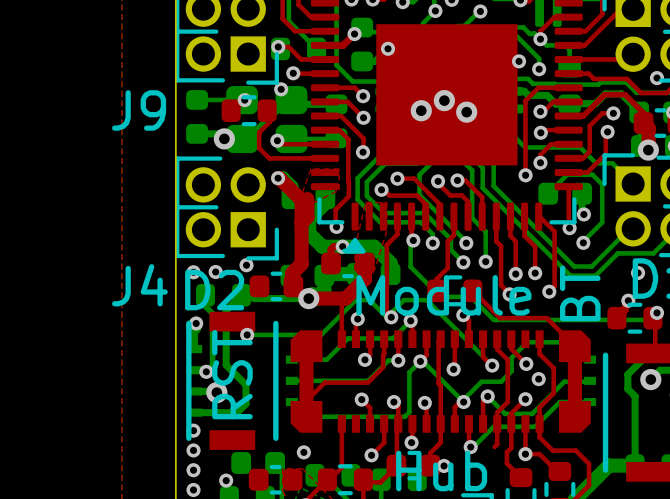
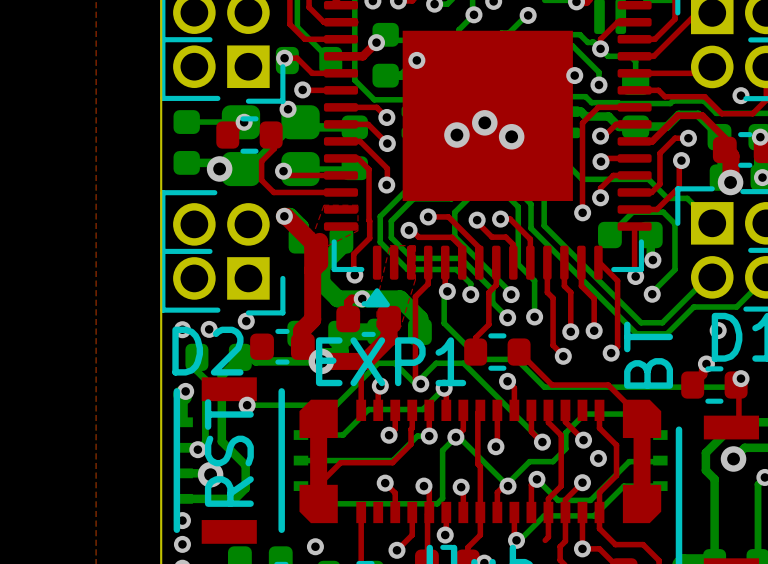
J9 name: J9 (139, 110) -> none
J4 name: J4 (139, 285) -> none
text: Module (443, 295) -> none
text: none -> EXP1 (391, 361)

